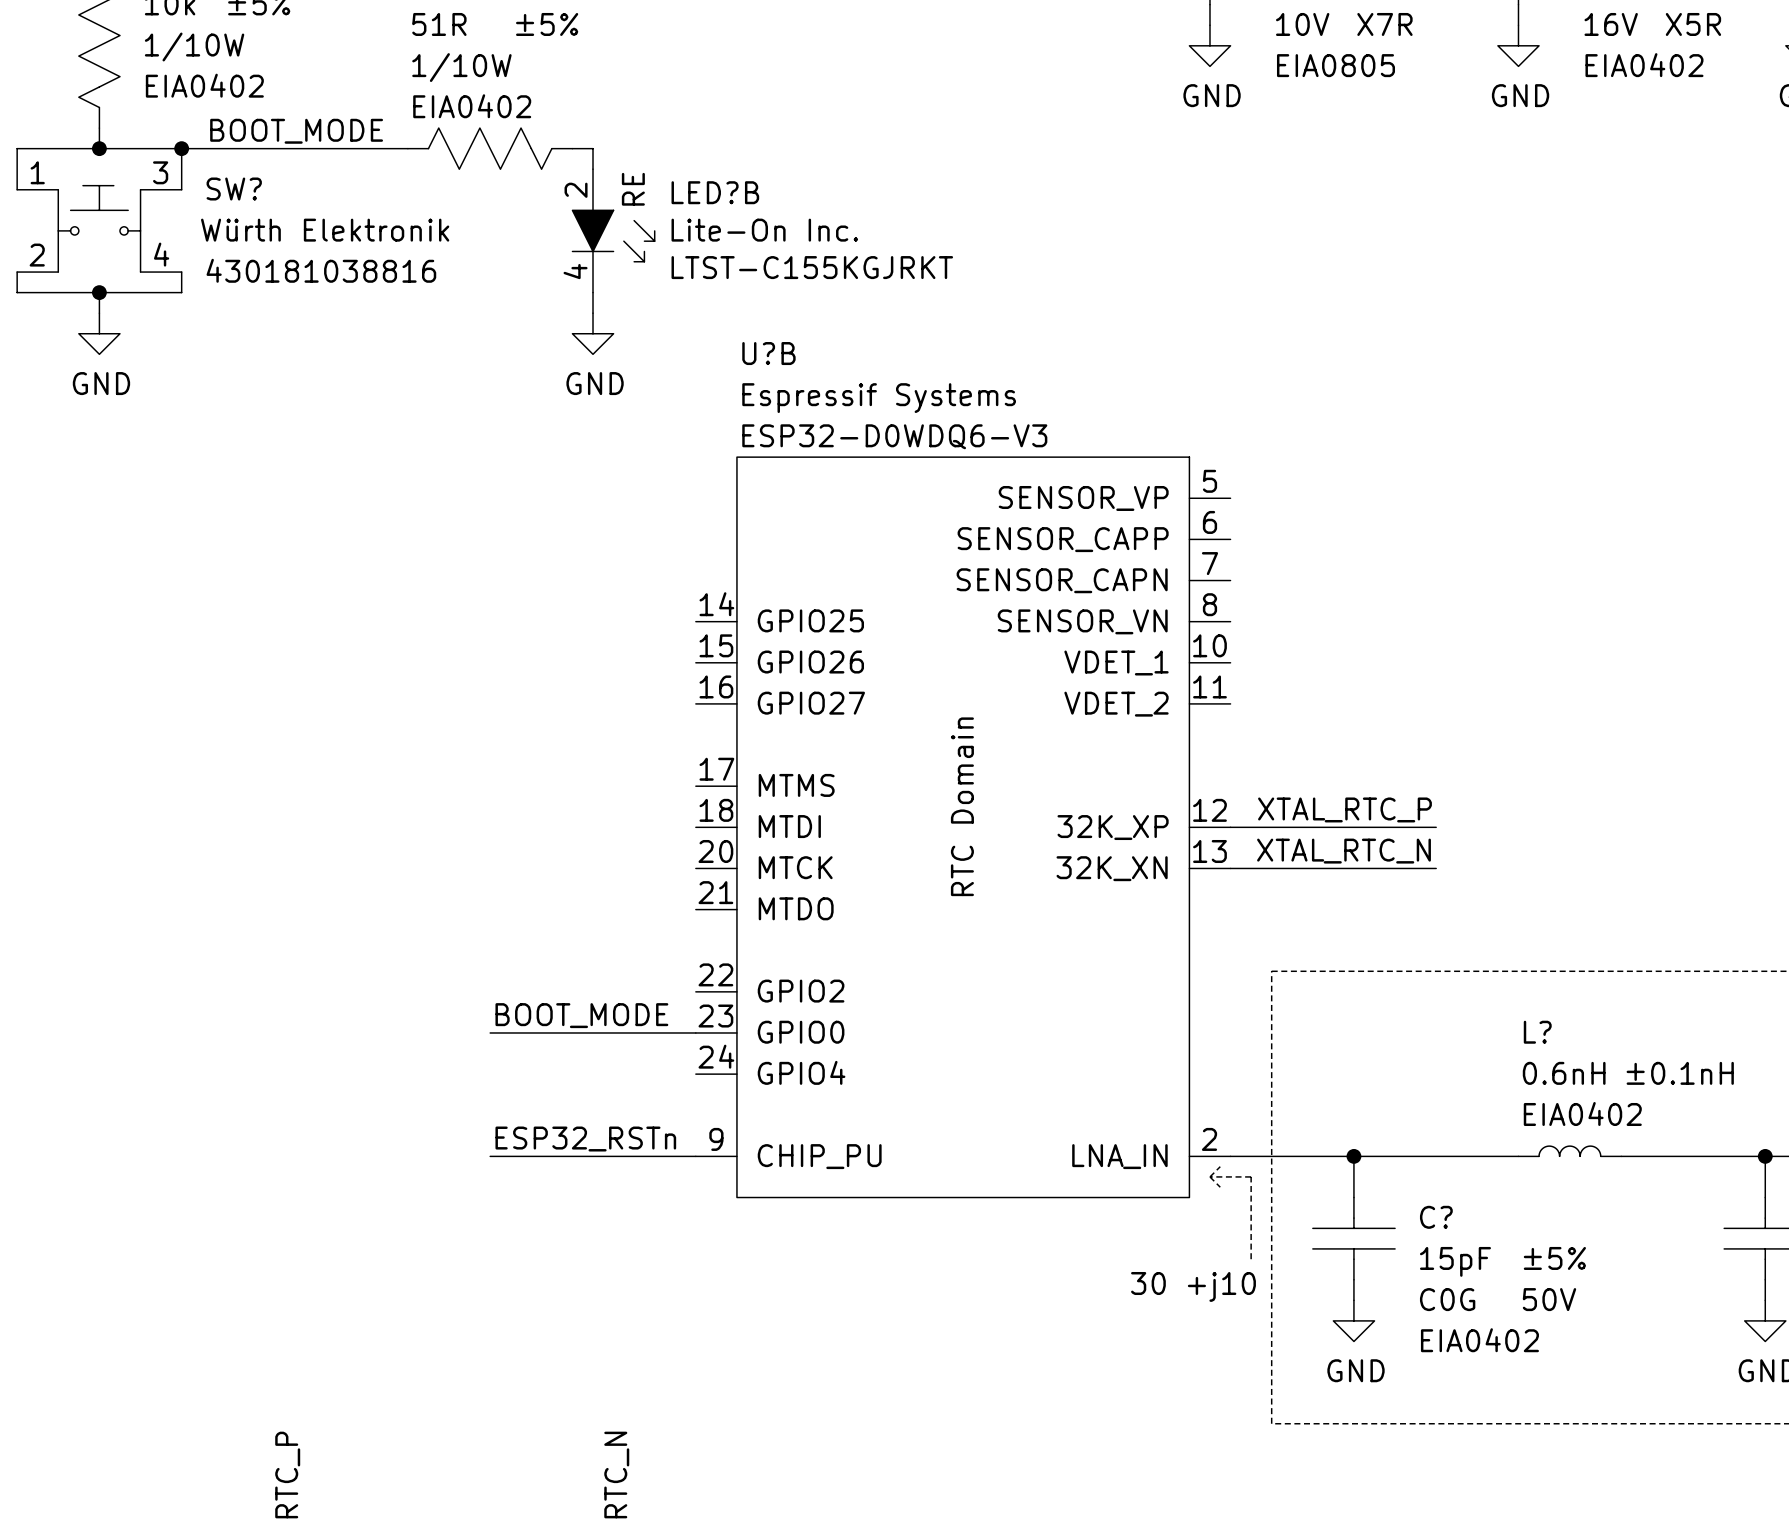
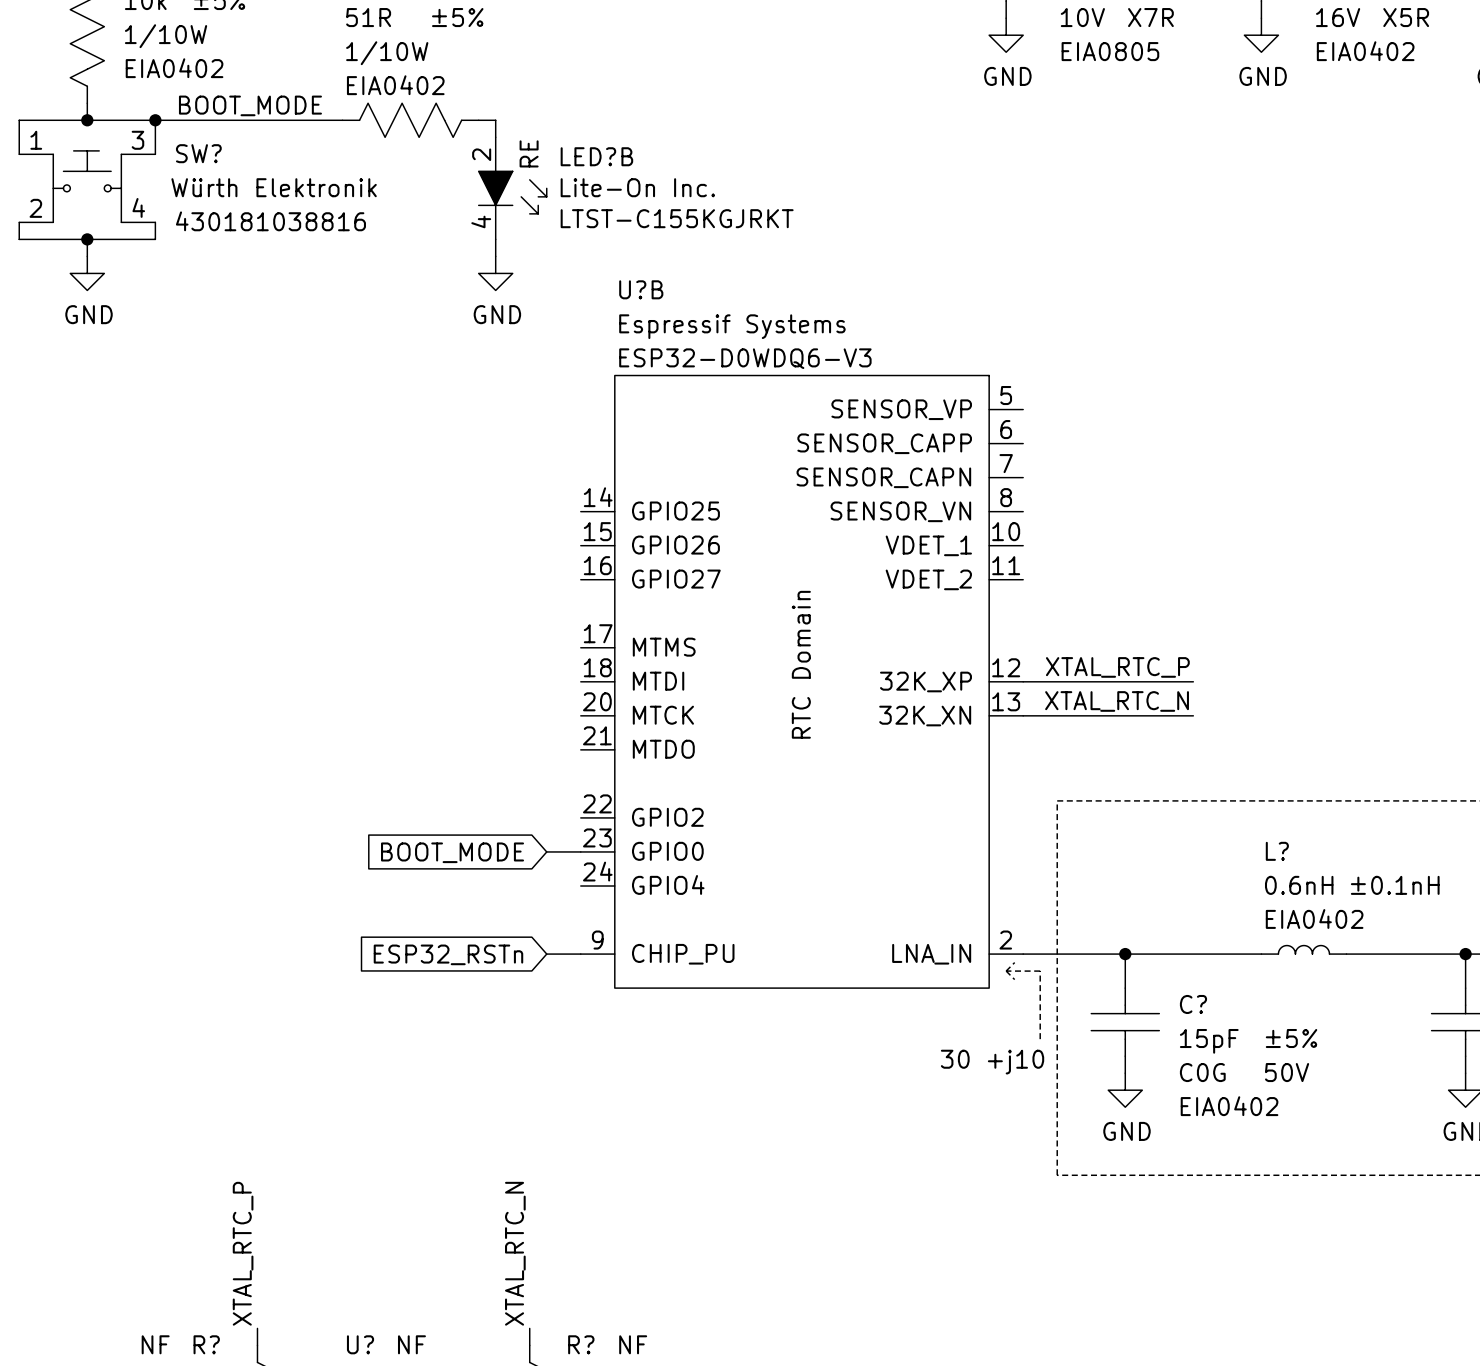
label: BOOT_MODE (581, 1015) -> none
wire: (490, 1032) (654, 1032) -> none
global label: none -> BOOT_MODE (452, 852)
label: ESP32_RSTn (585, 1139) -> none
wire: (490, 1156) (654, 1156) -> none
global label: none -> ESP32_RSTn (448, 954)

